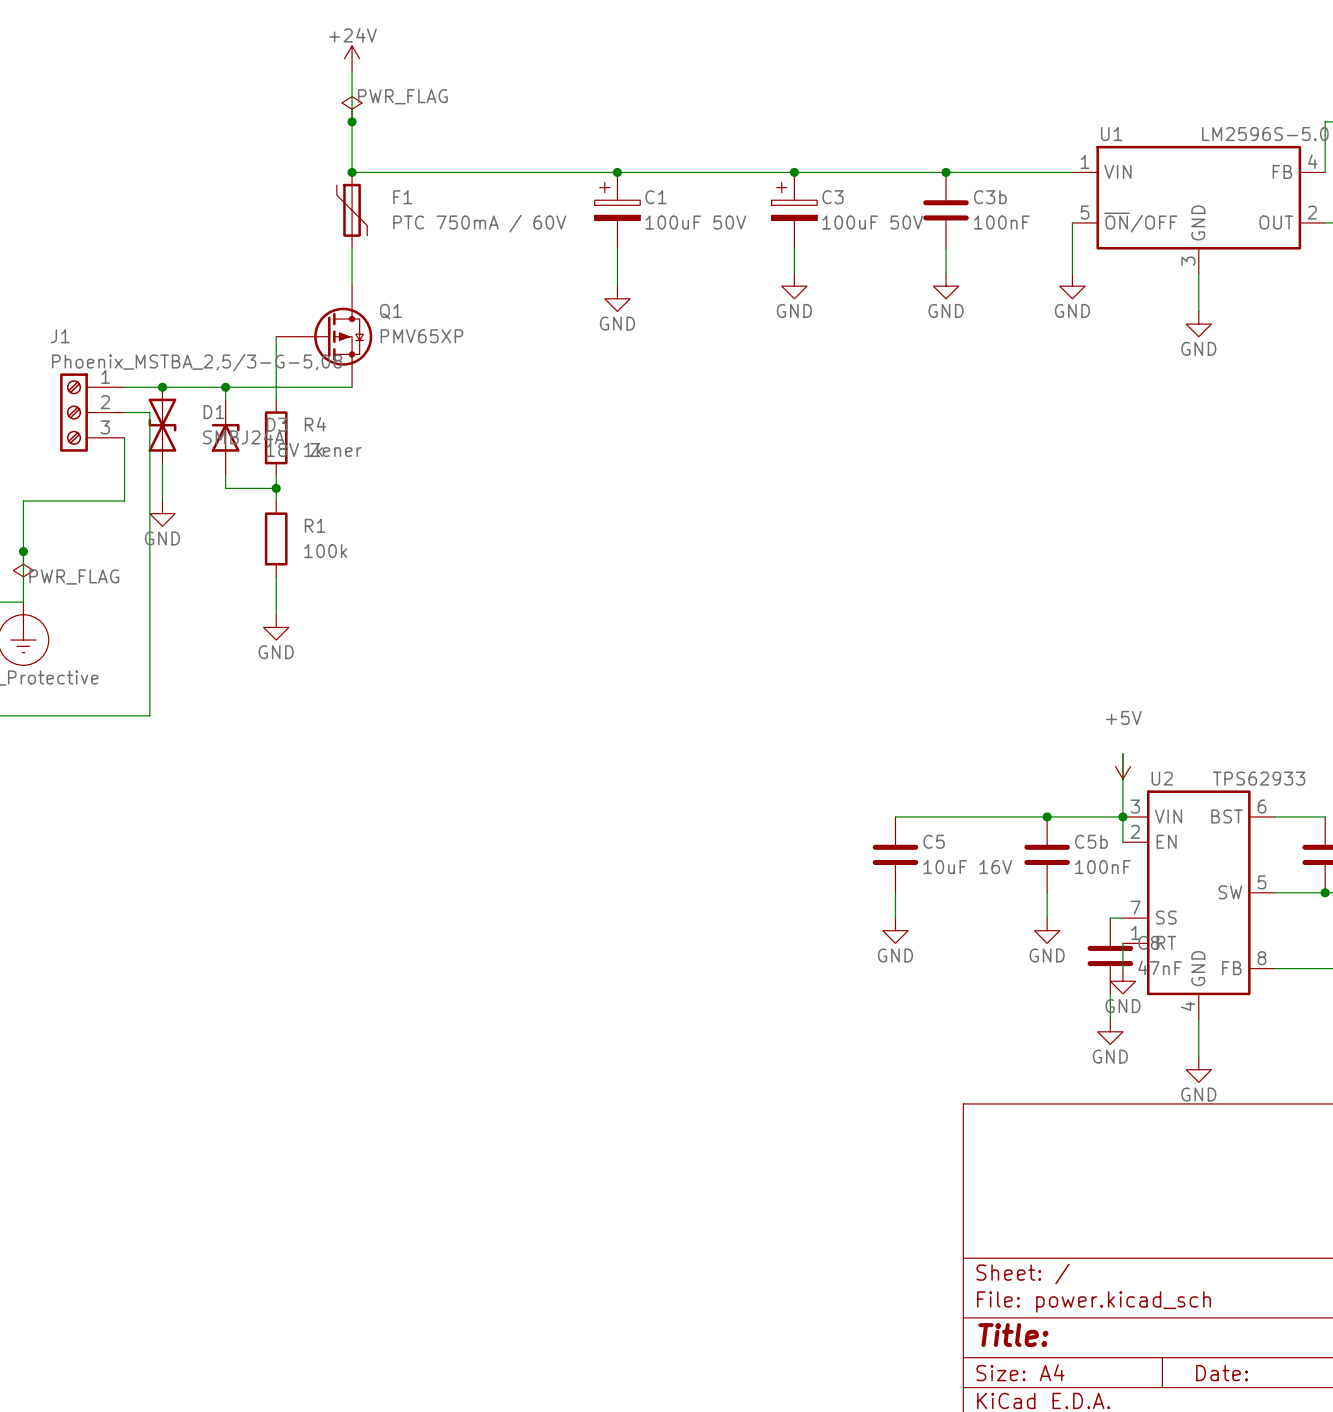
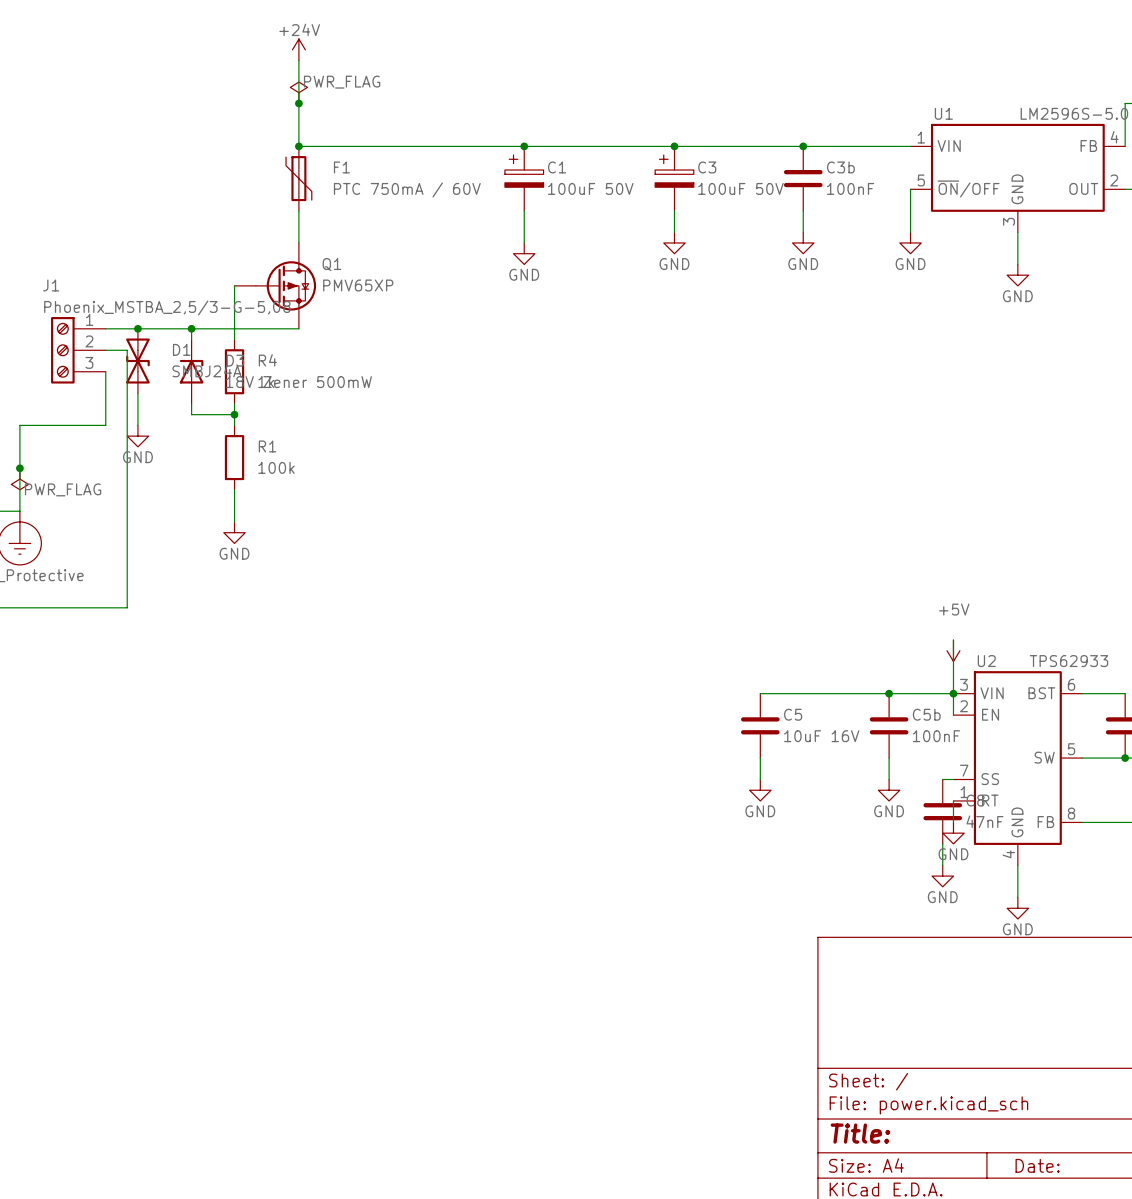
D3 value: 18V Zener (313, 449) -> 18V Zener 500mW (298, 382)

